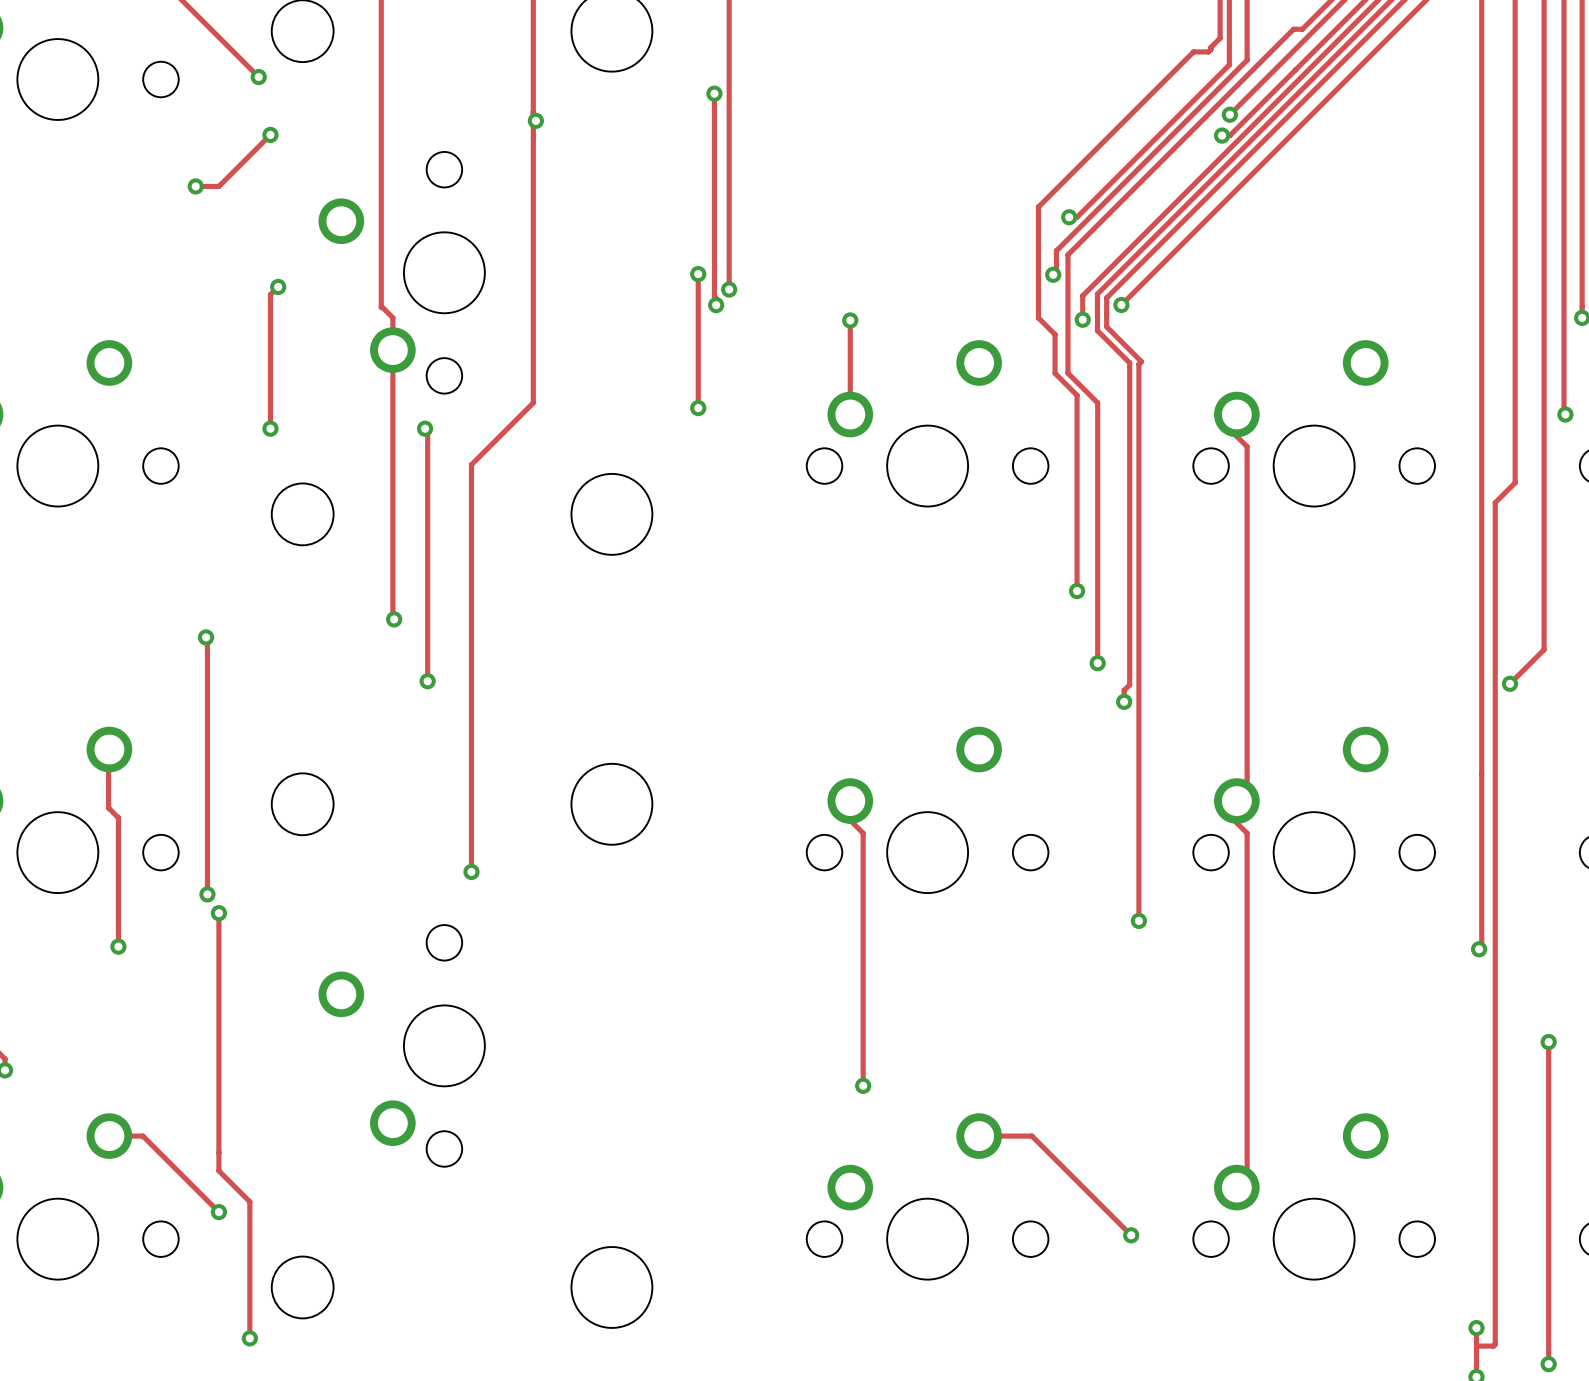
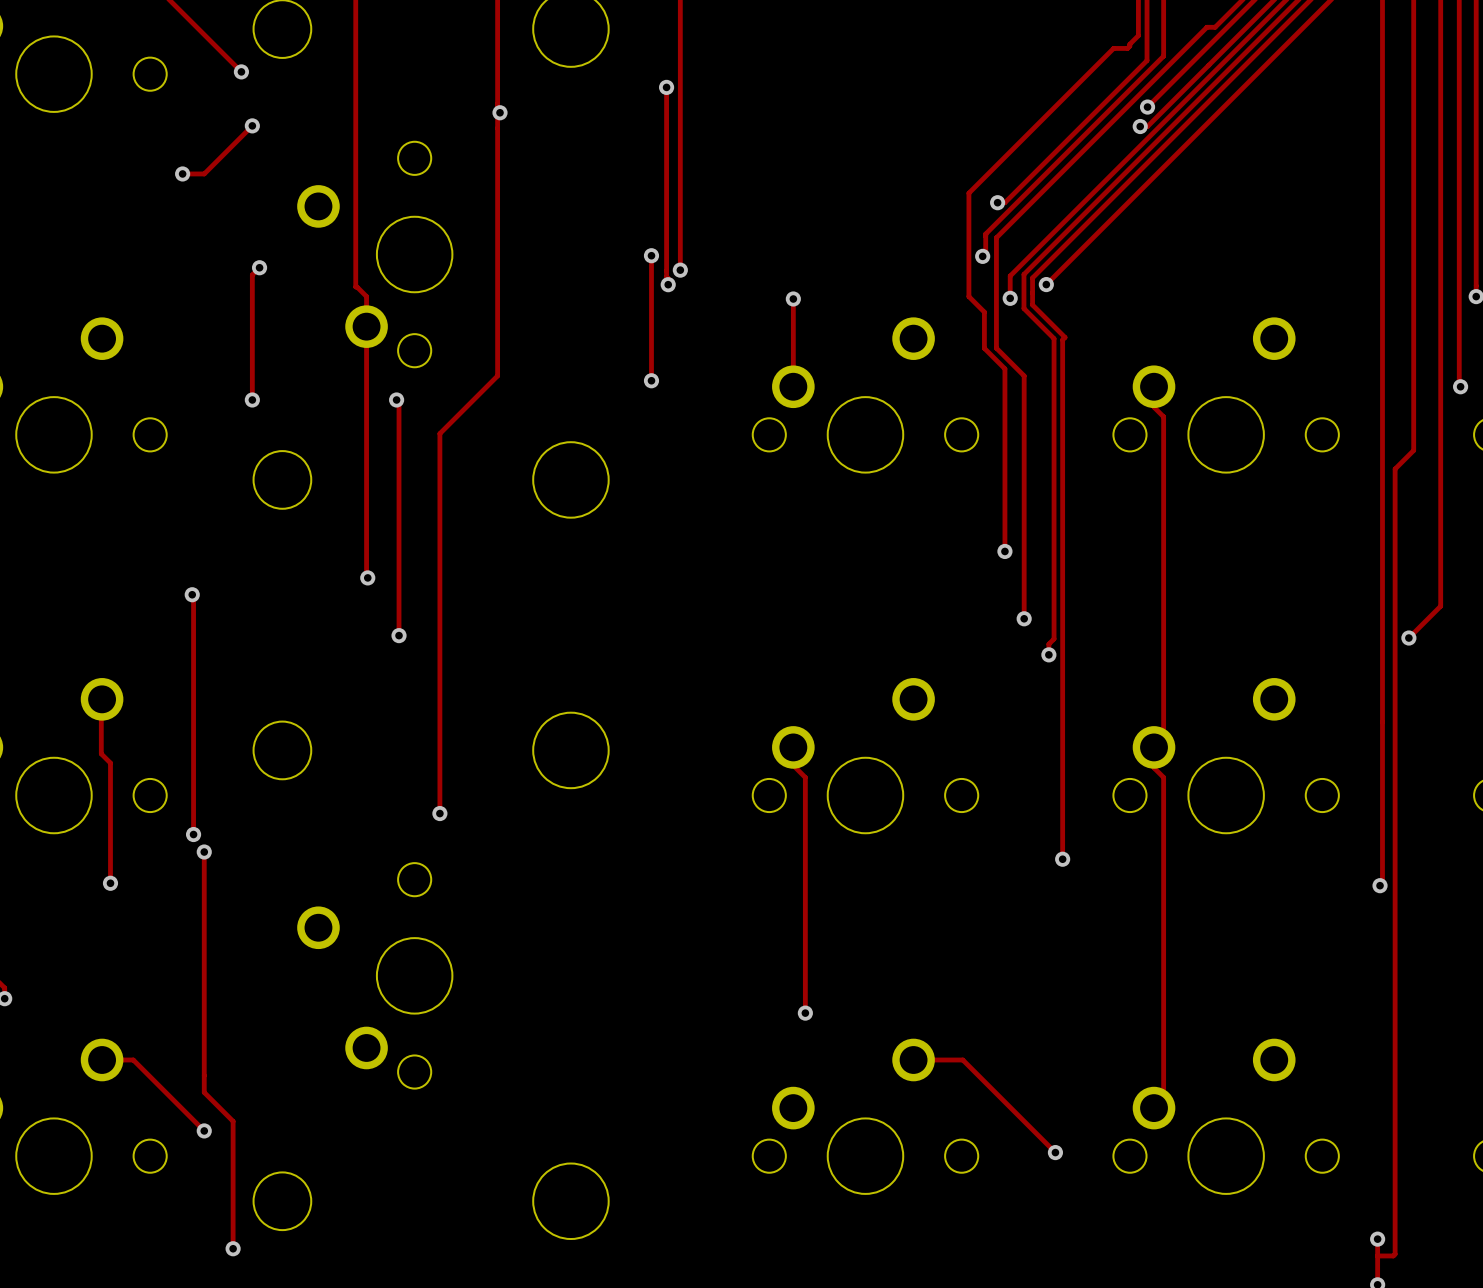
track: (1548, 1042) (1548, 1364) -> none
via: (1548, 1042) -> none
via: (1548, 1364) -> none

